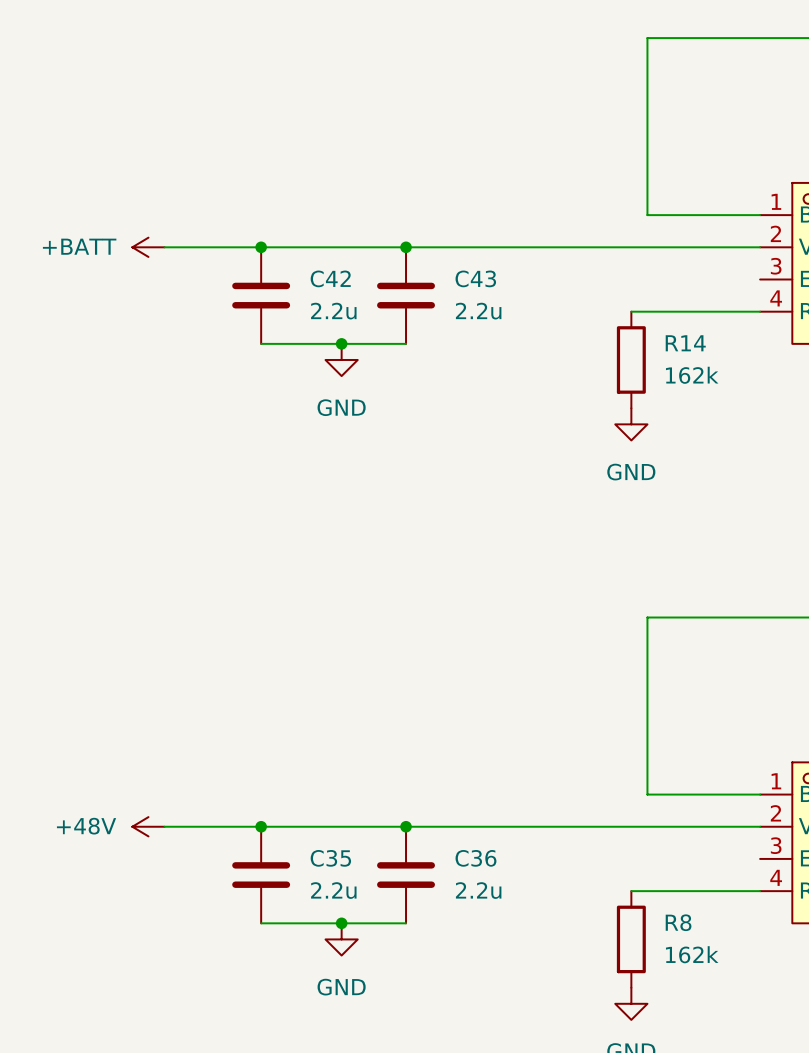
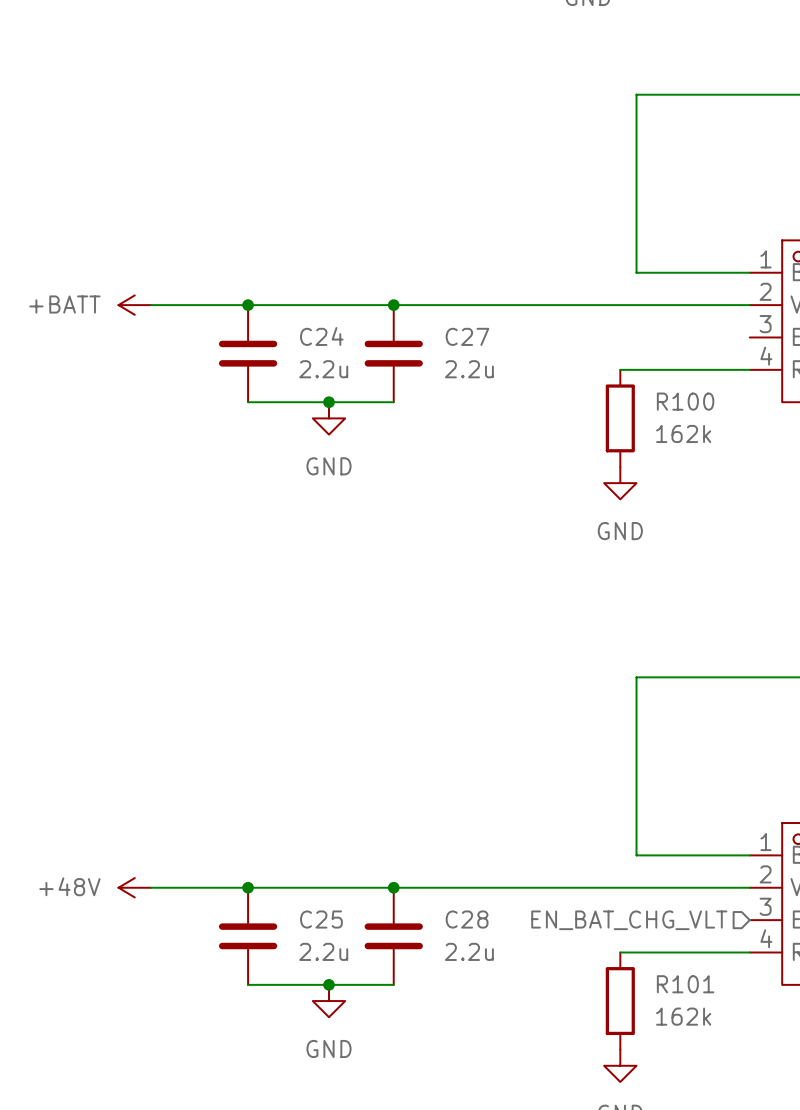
C42 name: C42 (330, 278) -> C24 (321, 336)
C43 name: C43 (475, 278) -> C27 (467, 336)
R14 name: R14 (685, 343) -> R100 (685, 401)
C35 name: C35 (330, 858) -> C25 (321, 919)
C36 name: C36 (475, 858) -> C28 (467, 919)
hierarchical label: none -> EN_BAT_CHG_VLT (629, 920)
R8 name: R8 (678, 922) -> R101 (685, 984)

